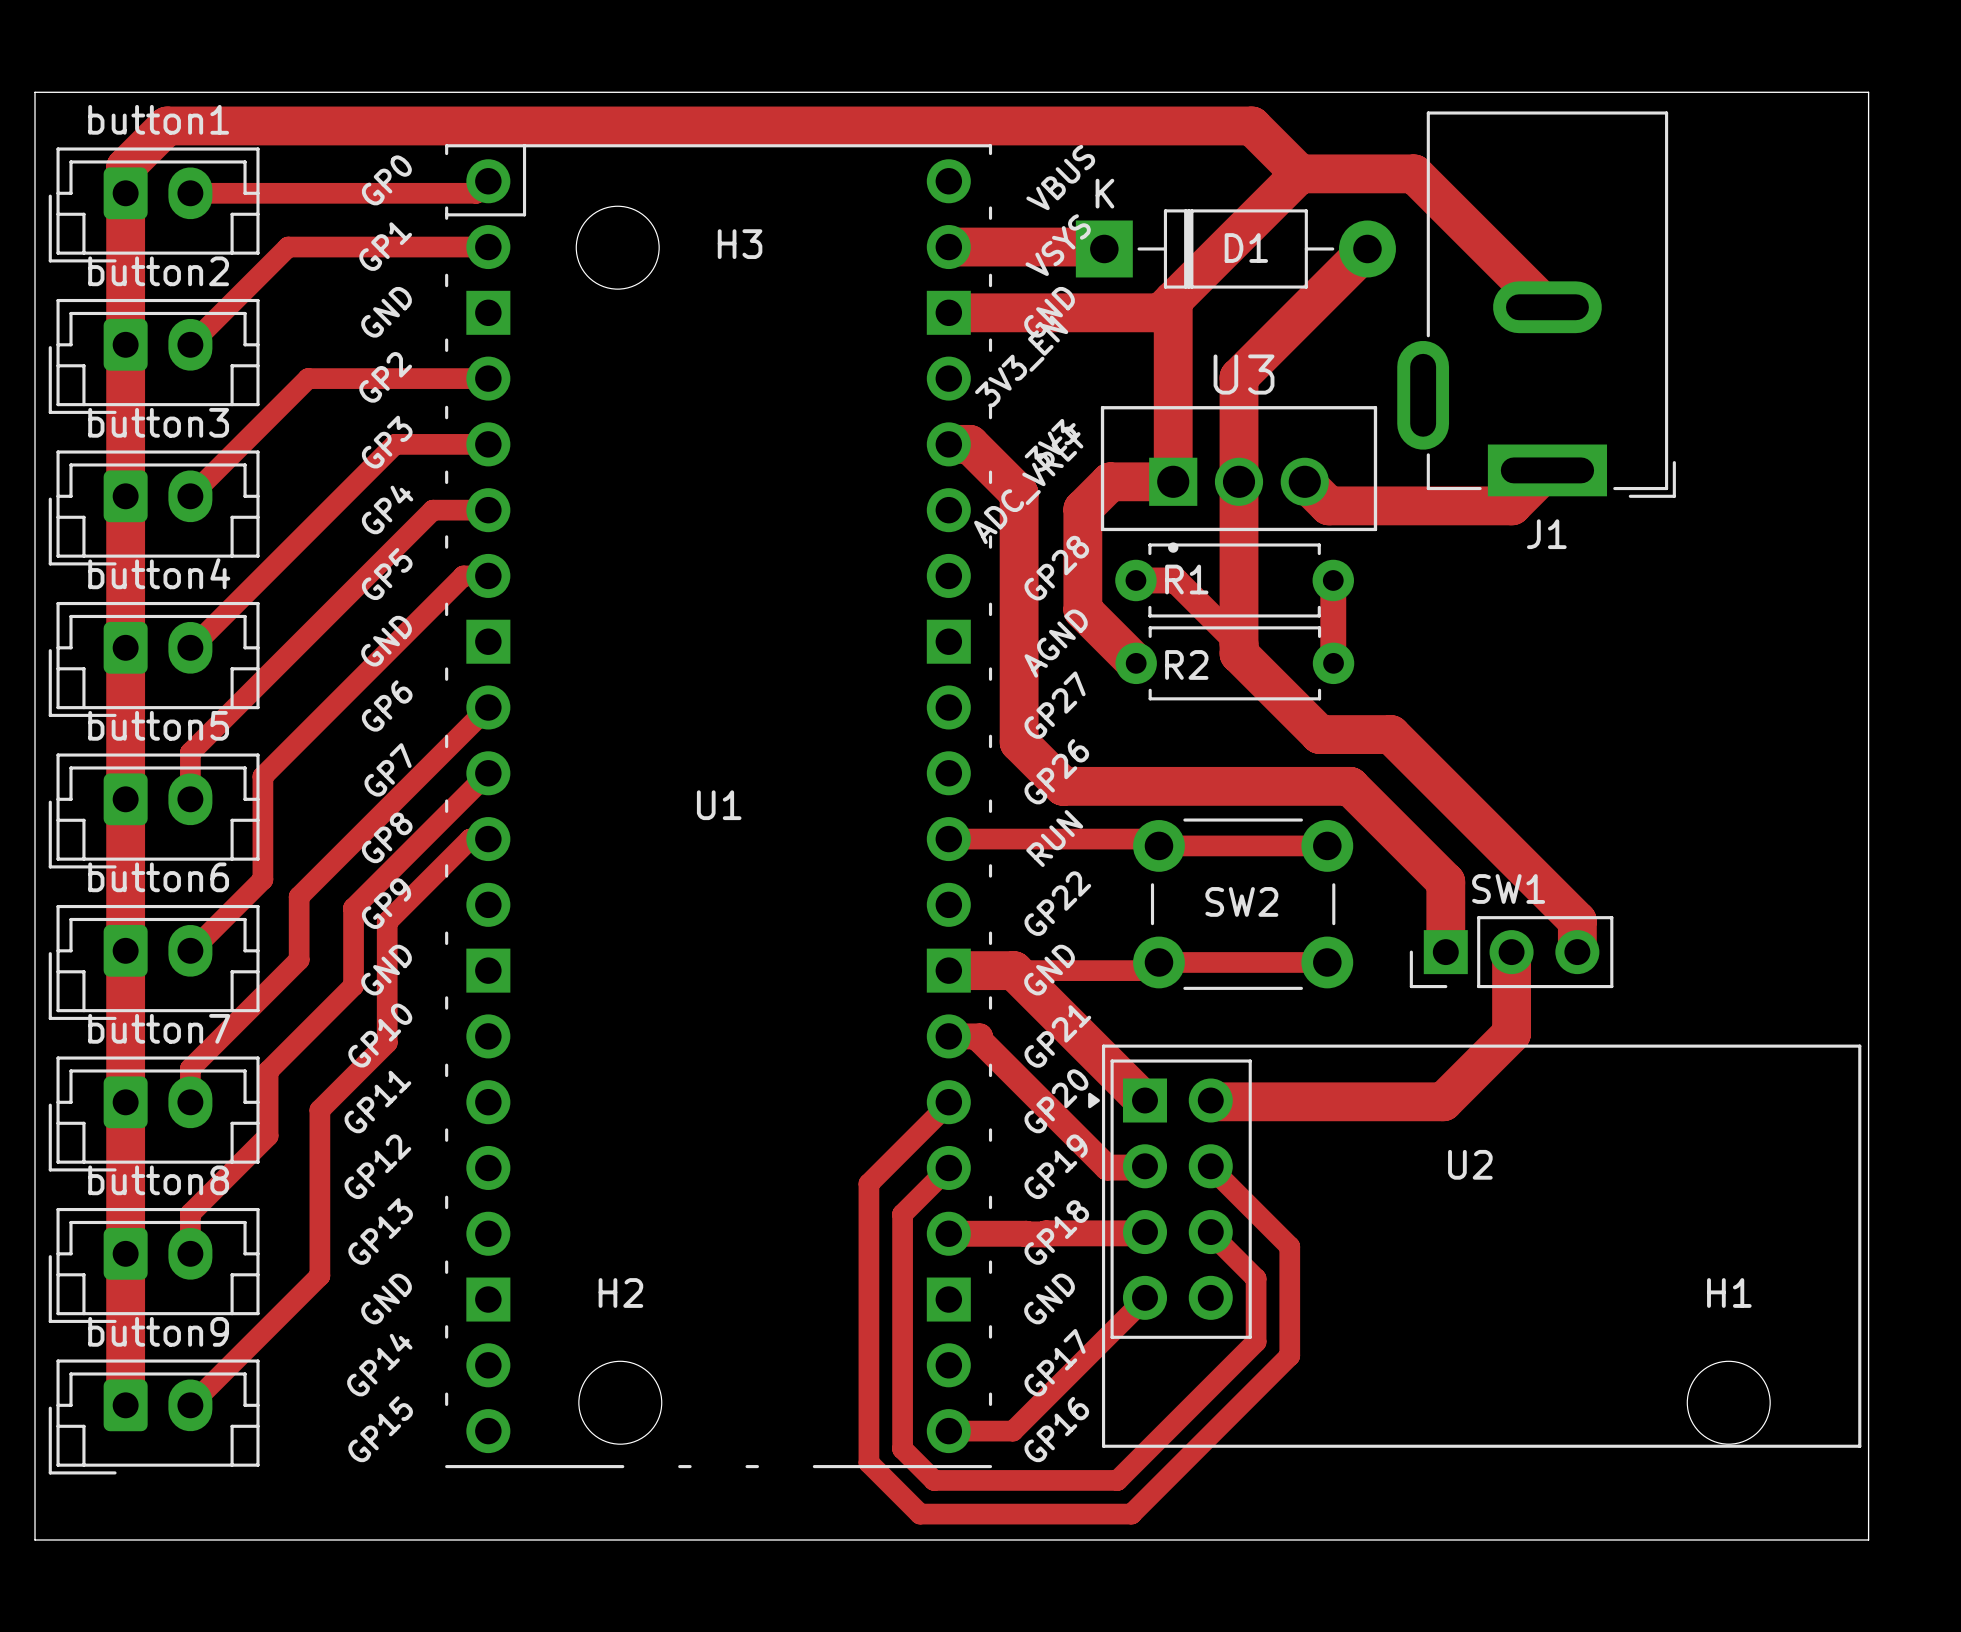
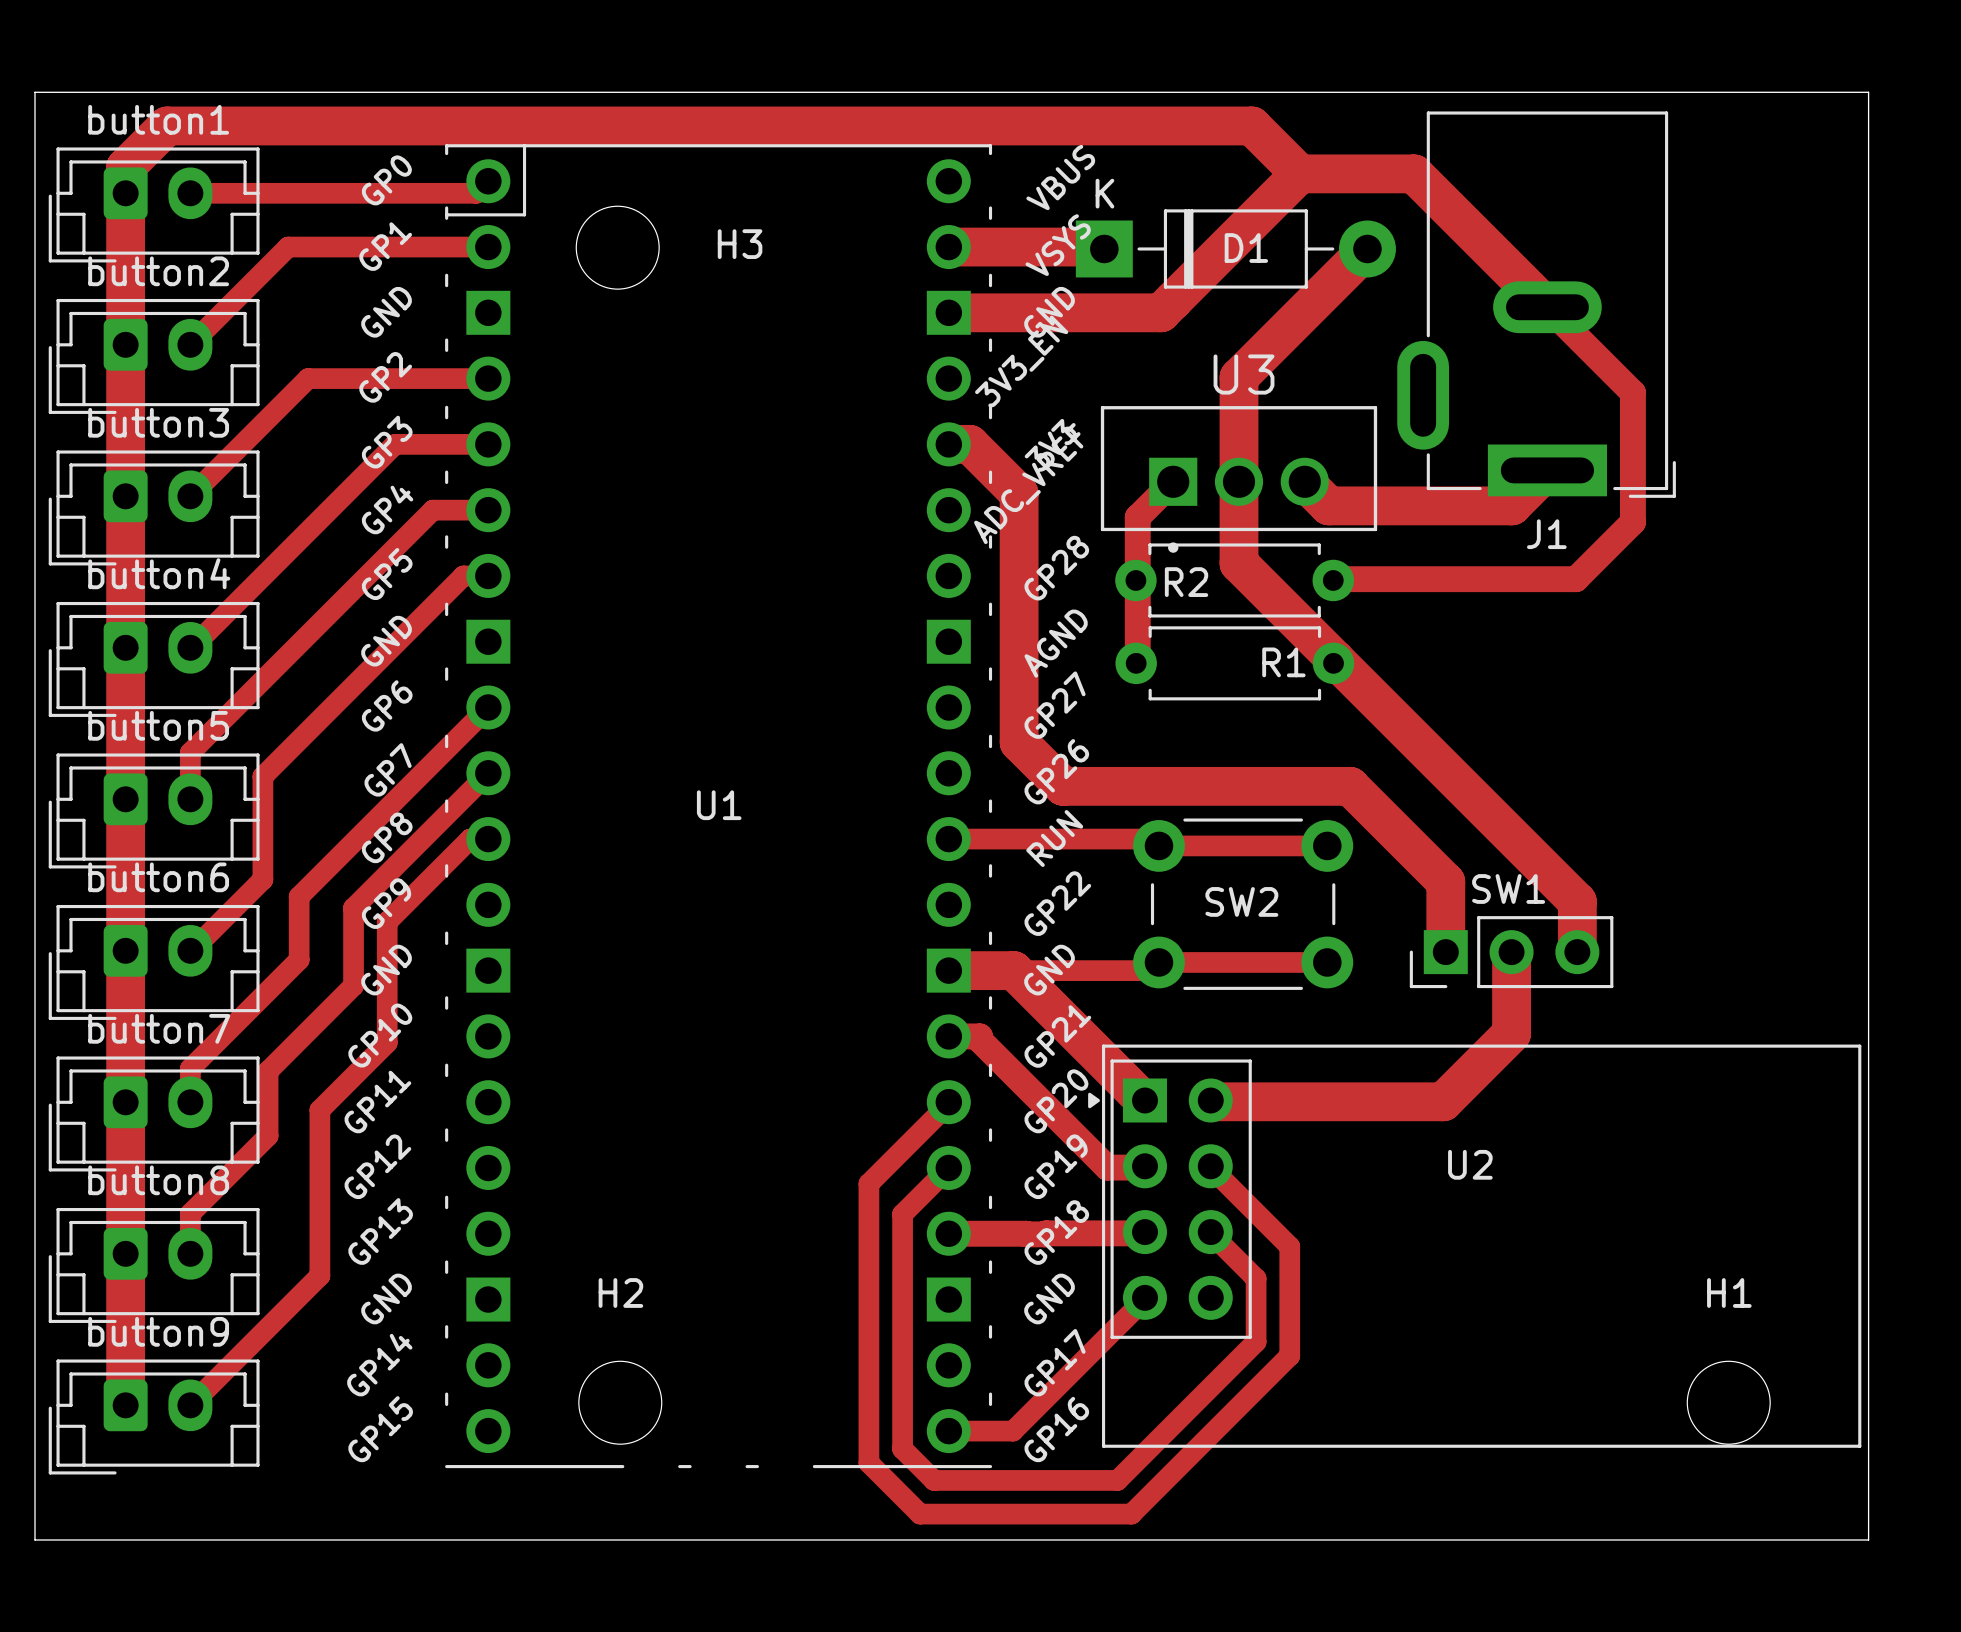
top track: (1173, 300) (1173, 481) (1110, 481) (1082, 509) (1082, 610) (1136, 663) -> none
top track: none -> (1547, 307) (1632, 392) (1632, 522) (1575, 579) (1335, 579)
top track: none -> (1173, 481) (1137, 517) (1137, 659)
top track: (1239, 563) (1239, 653) (1319, 734) (1390, 734) (1577, 920) -> (1239, 563) (1577, 901) (1577, 920)
R1 name: R1 (1186, 579) -> R2 (1186, 582)
top track: (1135, 580) (1175, 580) (1239, 643) -> none
top track: (1333, 580) (1333, 663) -> none
R2 name: R2 (1186, 664) -> R1 (1283, 662)

